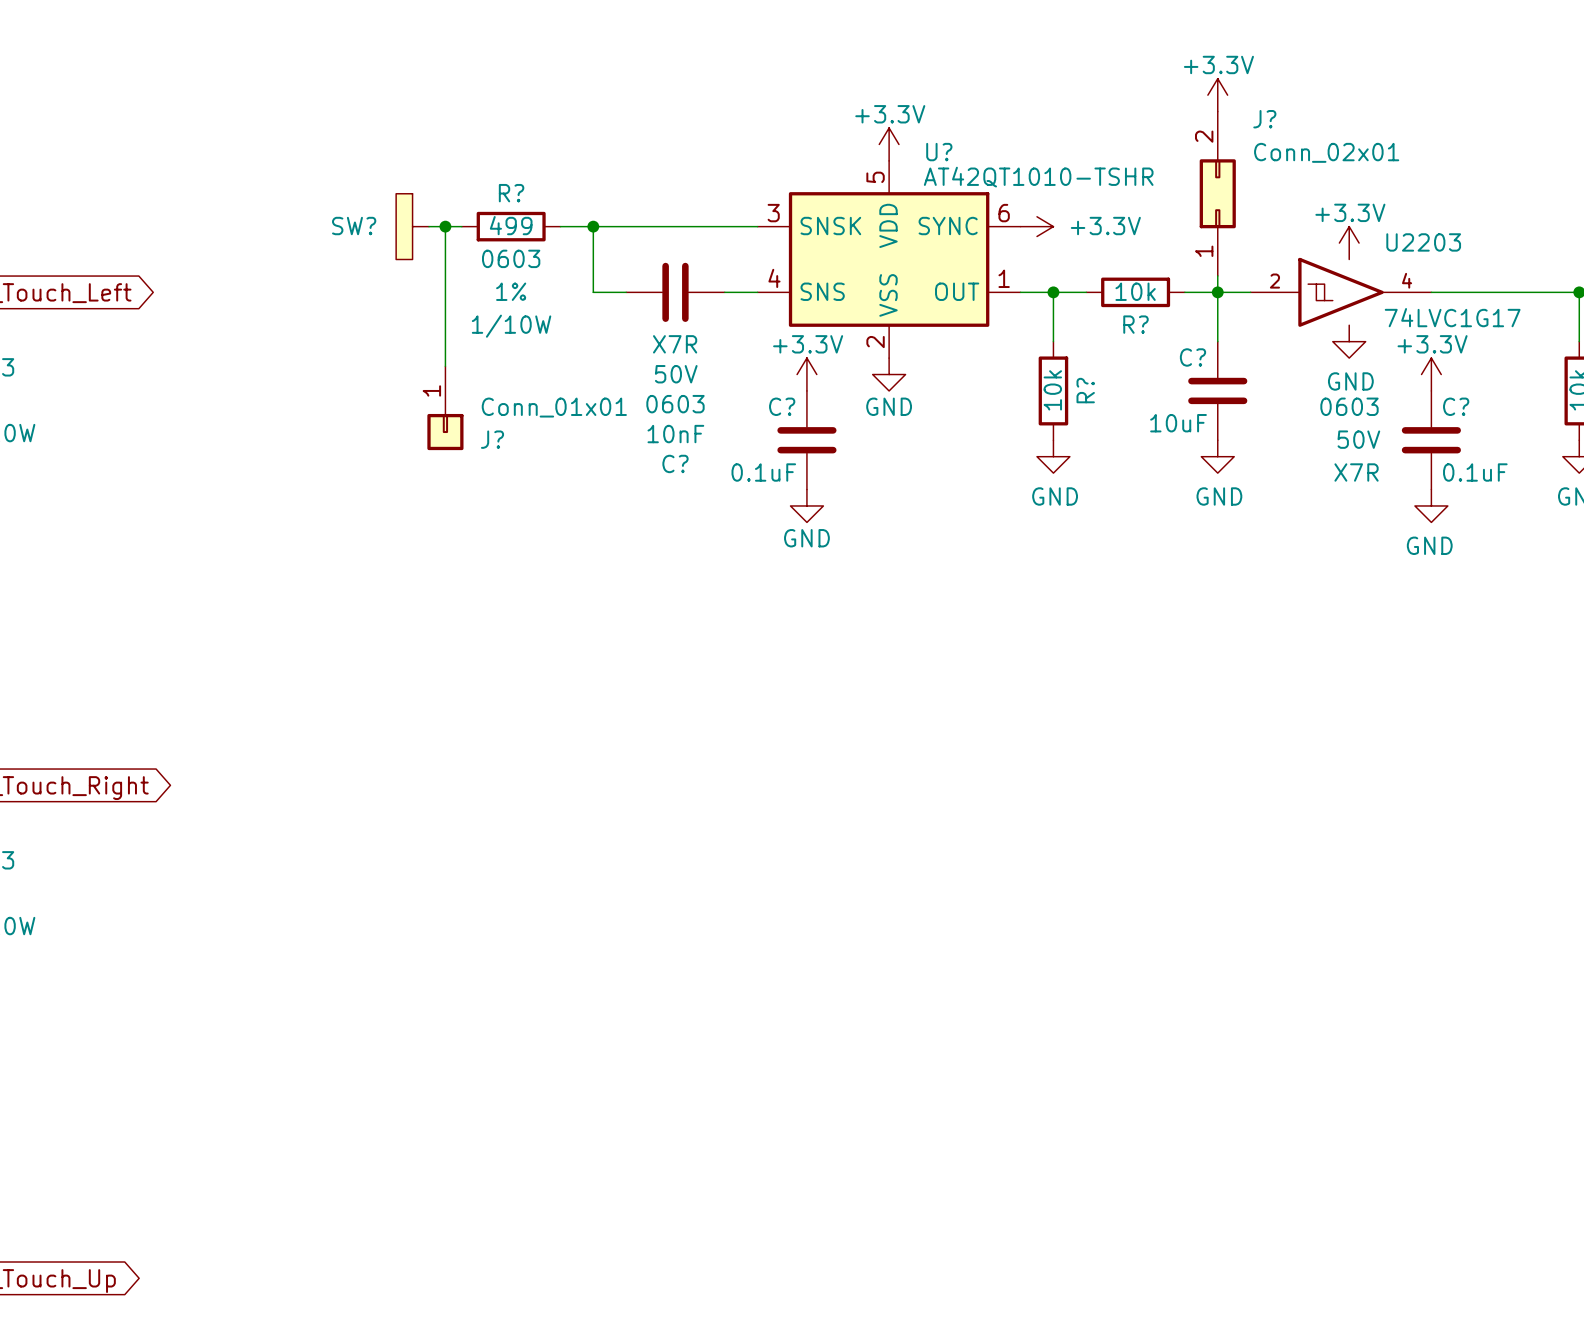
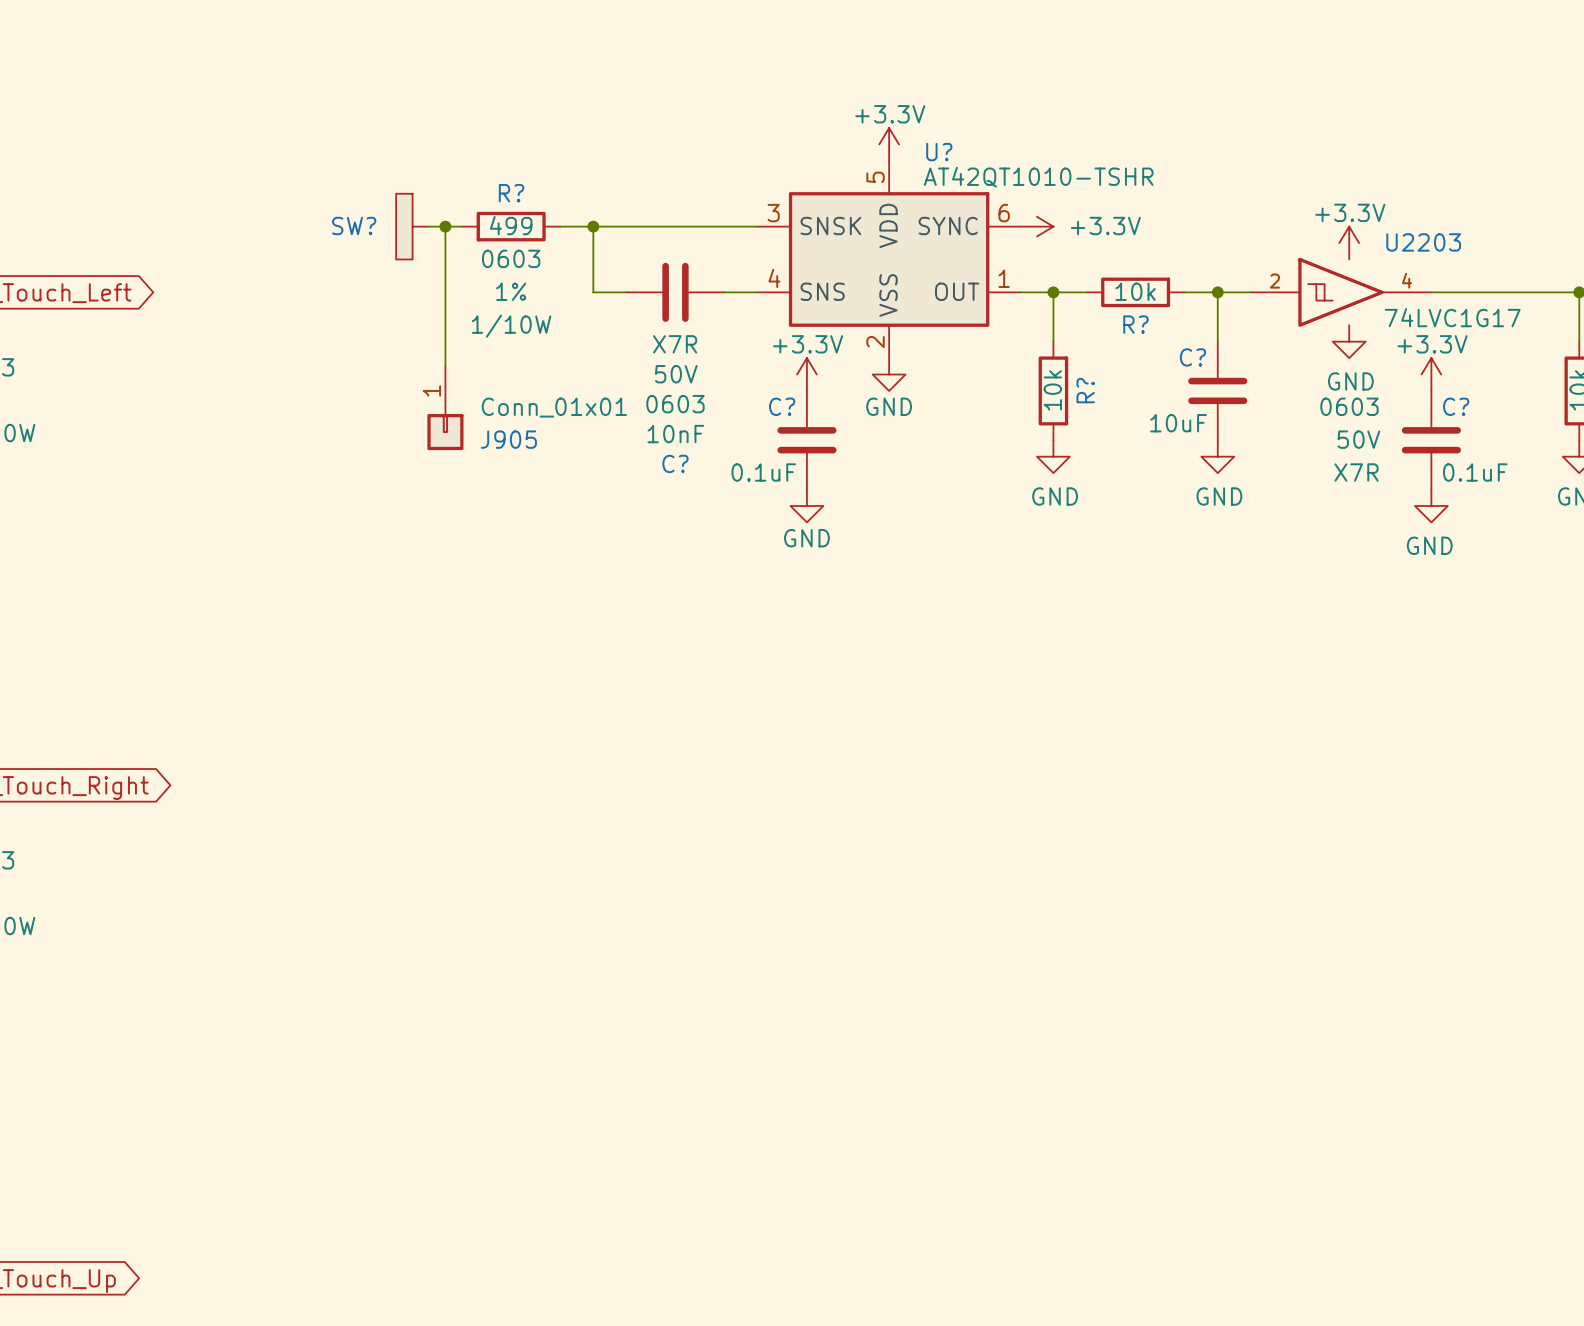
power symbol: +3.3V (1217, 95) -> none
J?: Conn_02x01 (1217, 193) -> none
wire: (1217, 275) (1217, 292) -> none
J? name: J? (492, 439) -> J905 (508, 439)

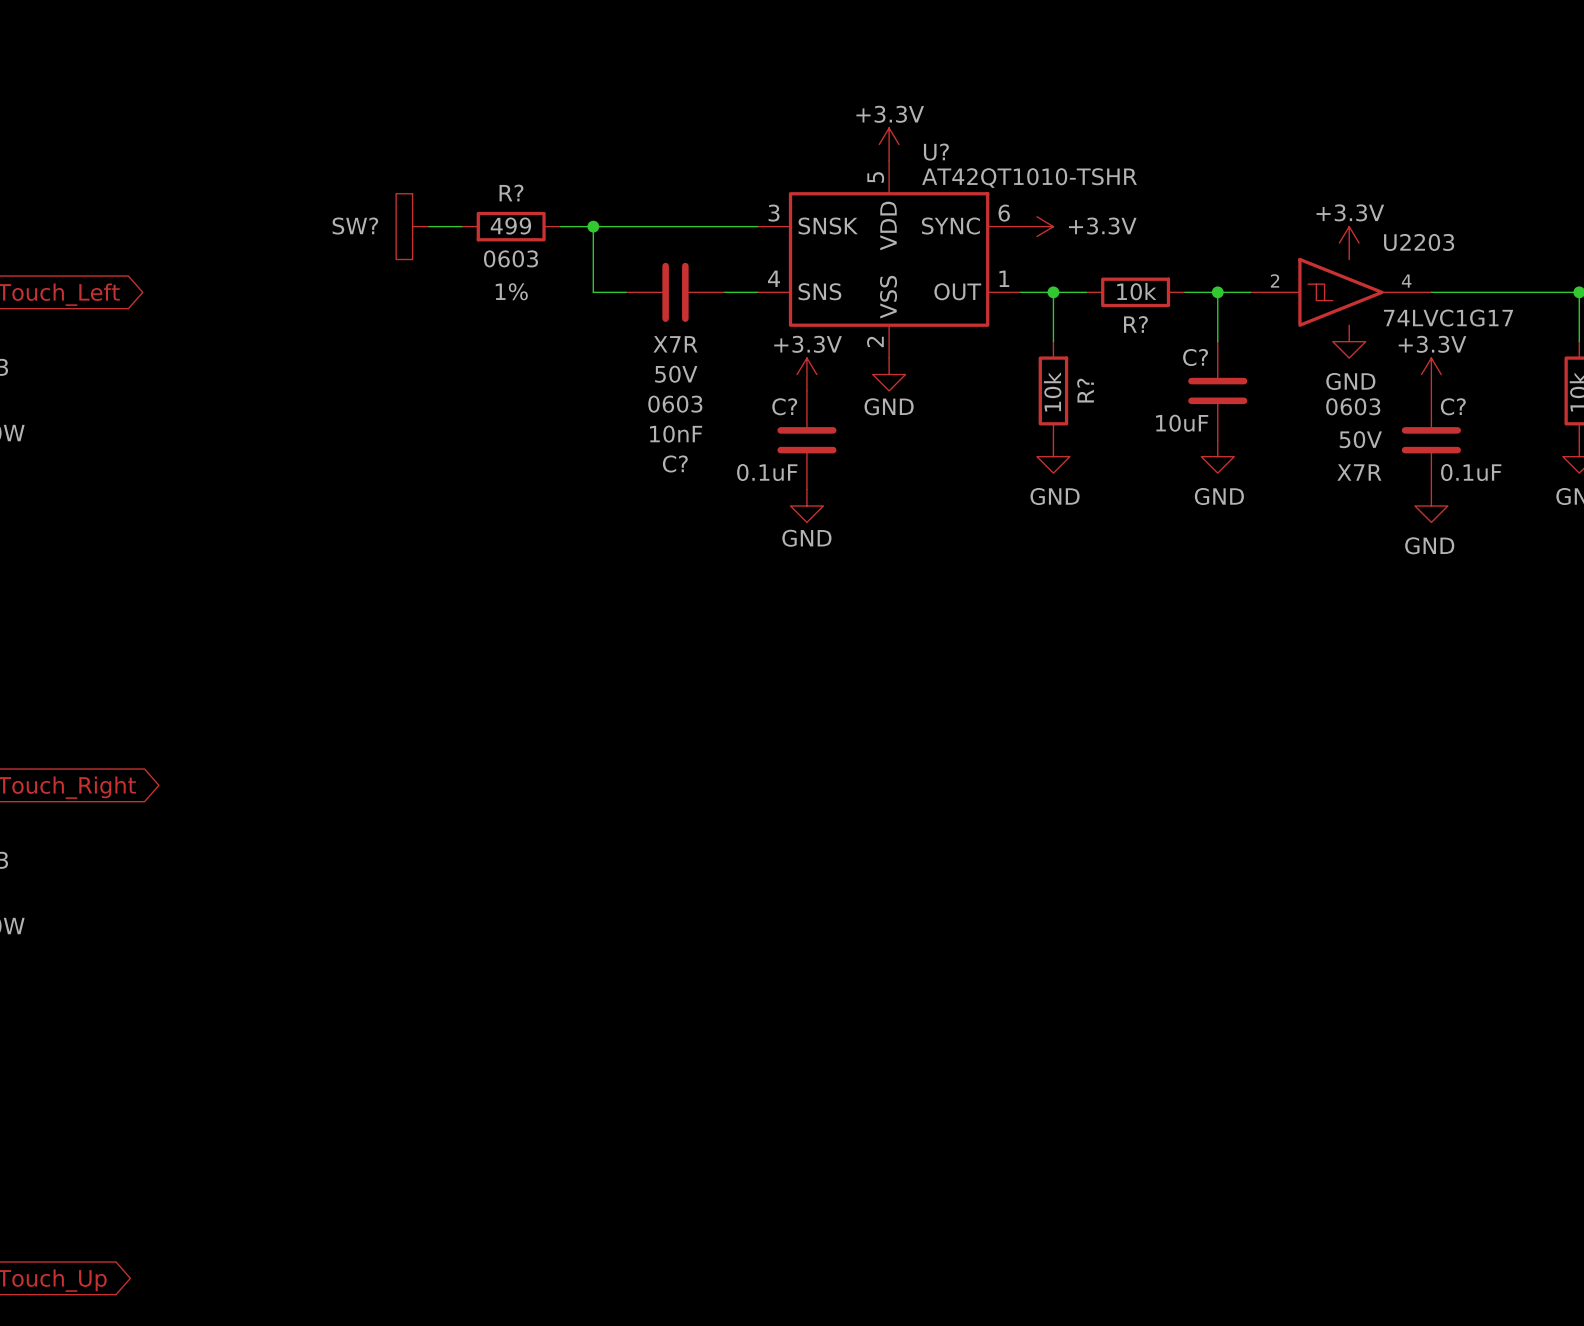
wire: (445, 226) (445, 366) -> none
junction: (445, 226) -> none
R? text: 1/10W (511, 326) -> none
J905: Conn_01x01 (445, 408) -> none

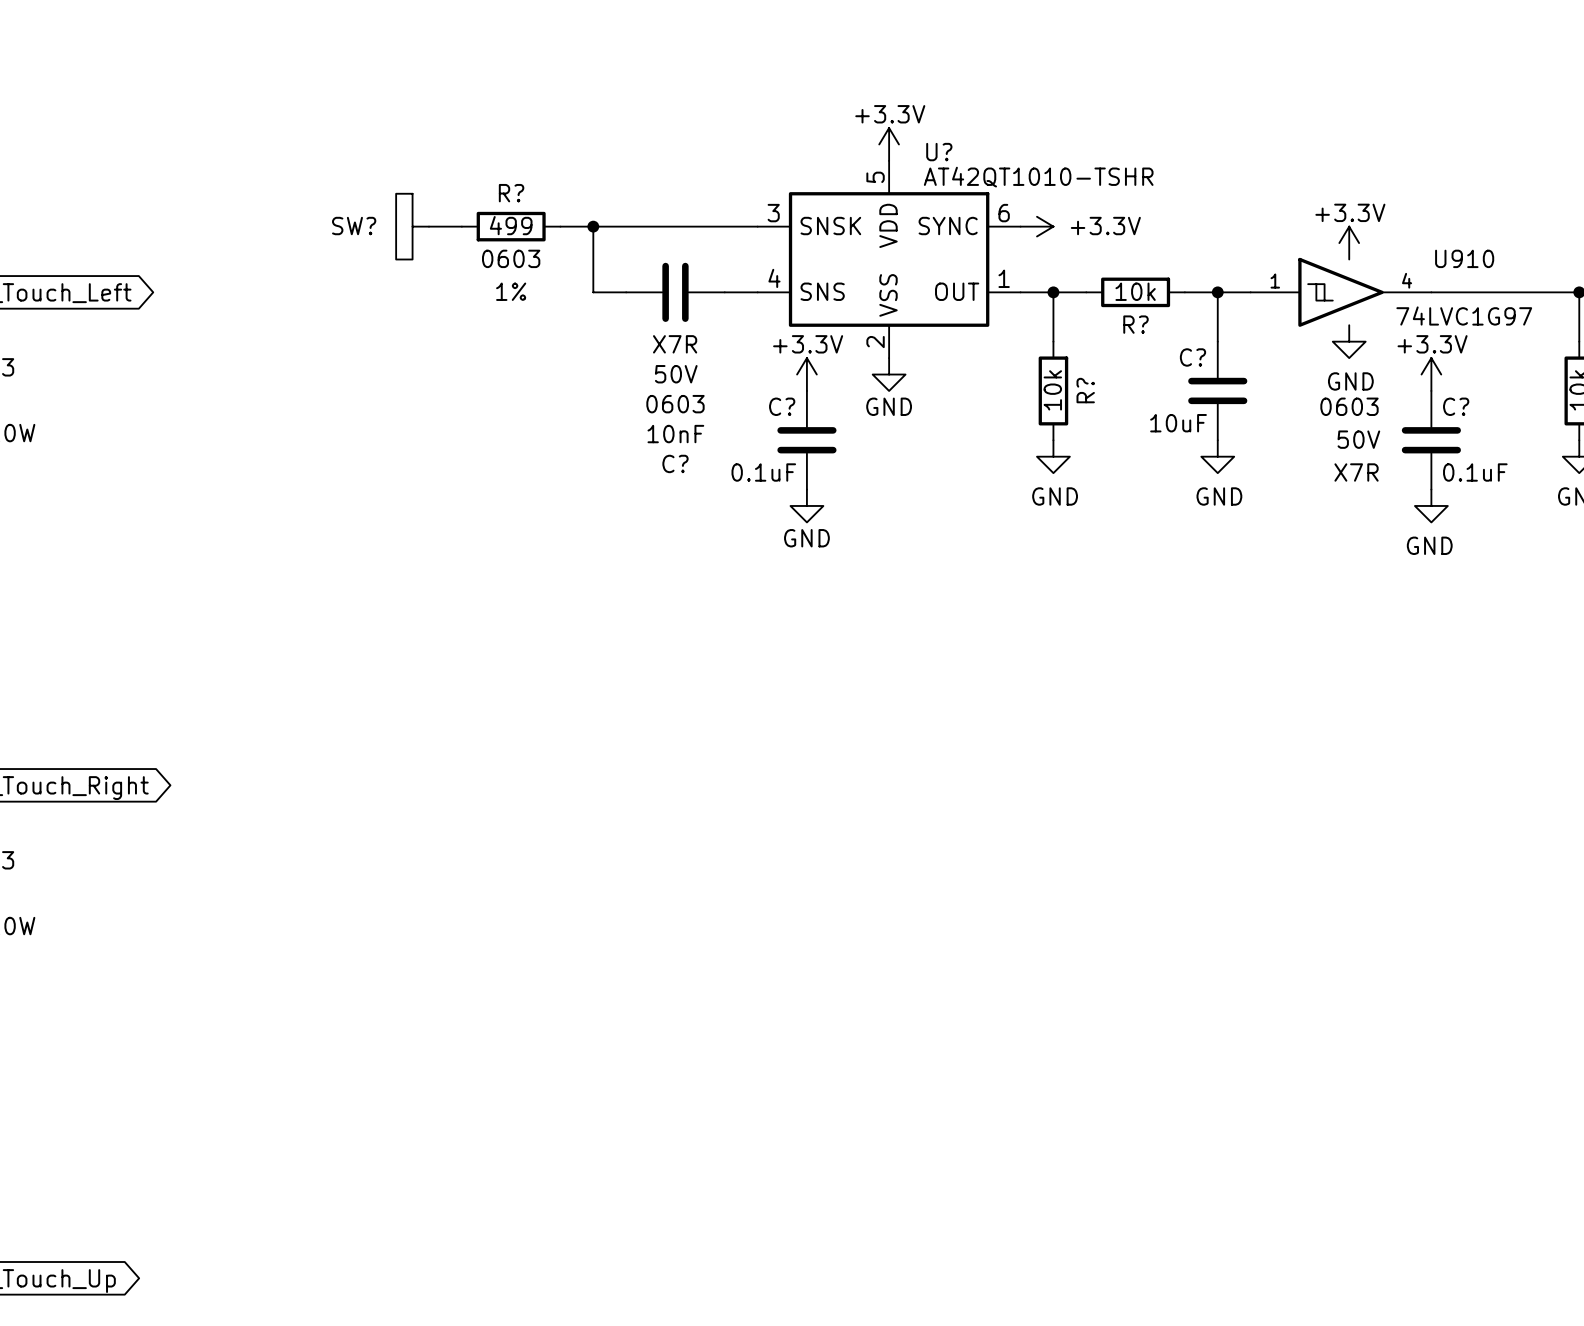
U2203 name: U2203 (1419, 242) -> U910 (1464, 258)
U2203 pin number: 2 (1275, 280) -> 1 (1275, 281)
U2203 value: 74LVC1G17 (1448, 318) -> 74LVC1G97 (1464, 316)

